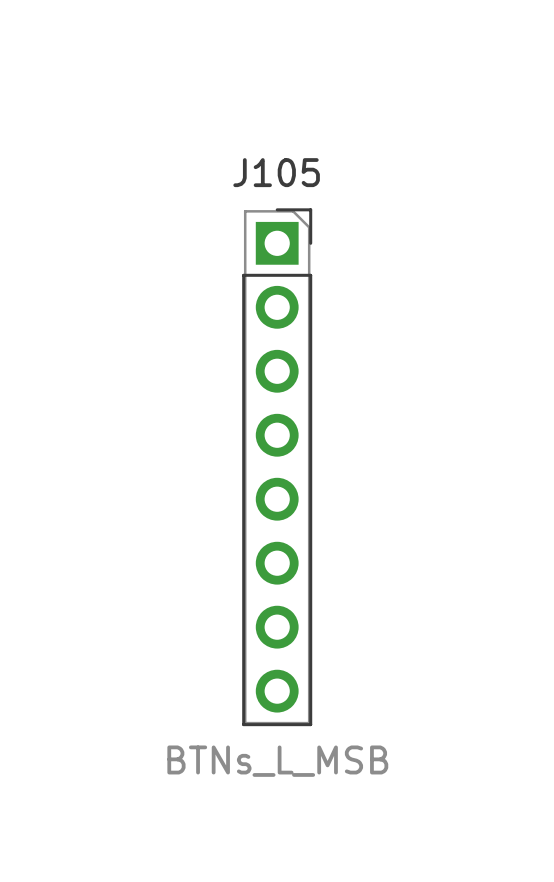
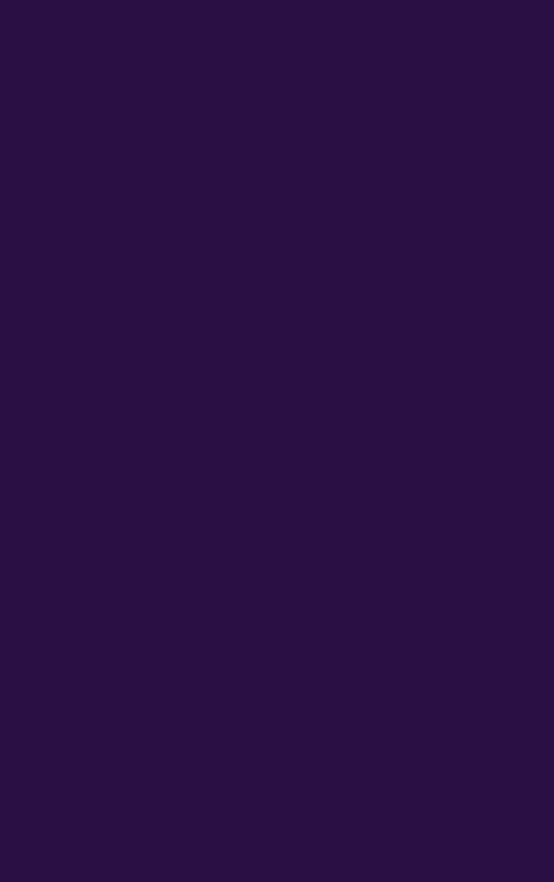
J105: BTNs_L_MSB (277, 467) -> none

